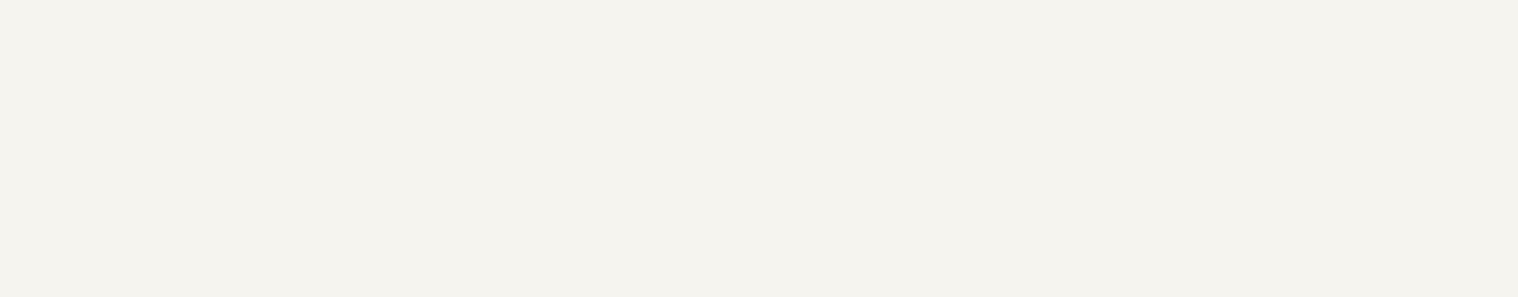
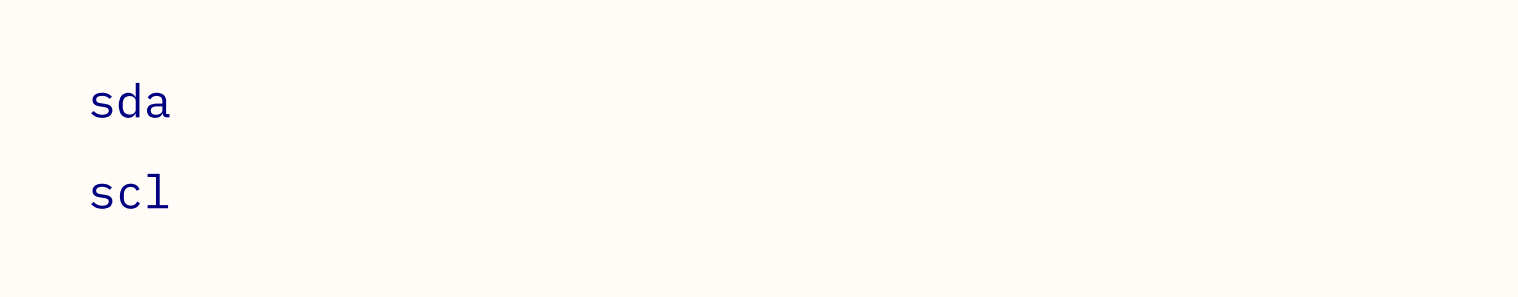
text: none -> sda (130, 100)
text: none -> scl (129, 191)

